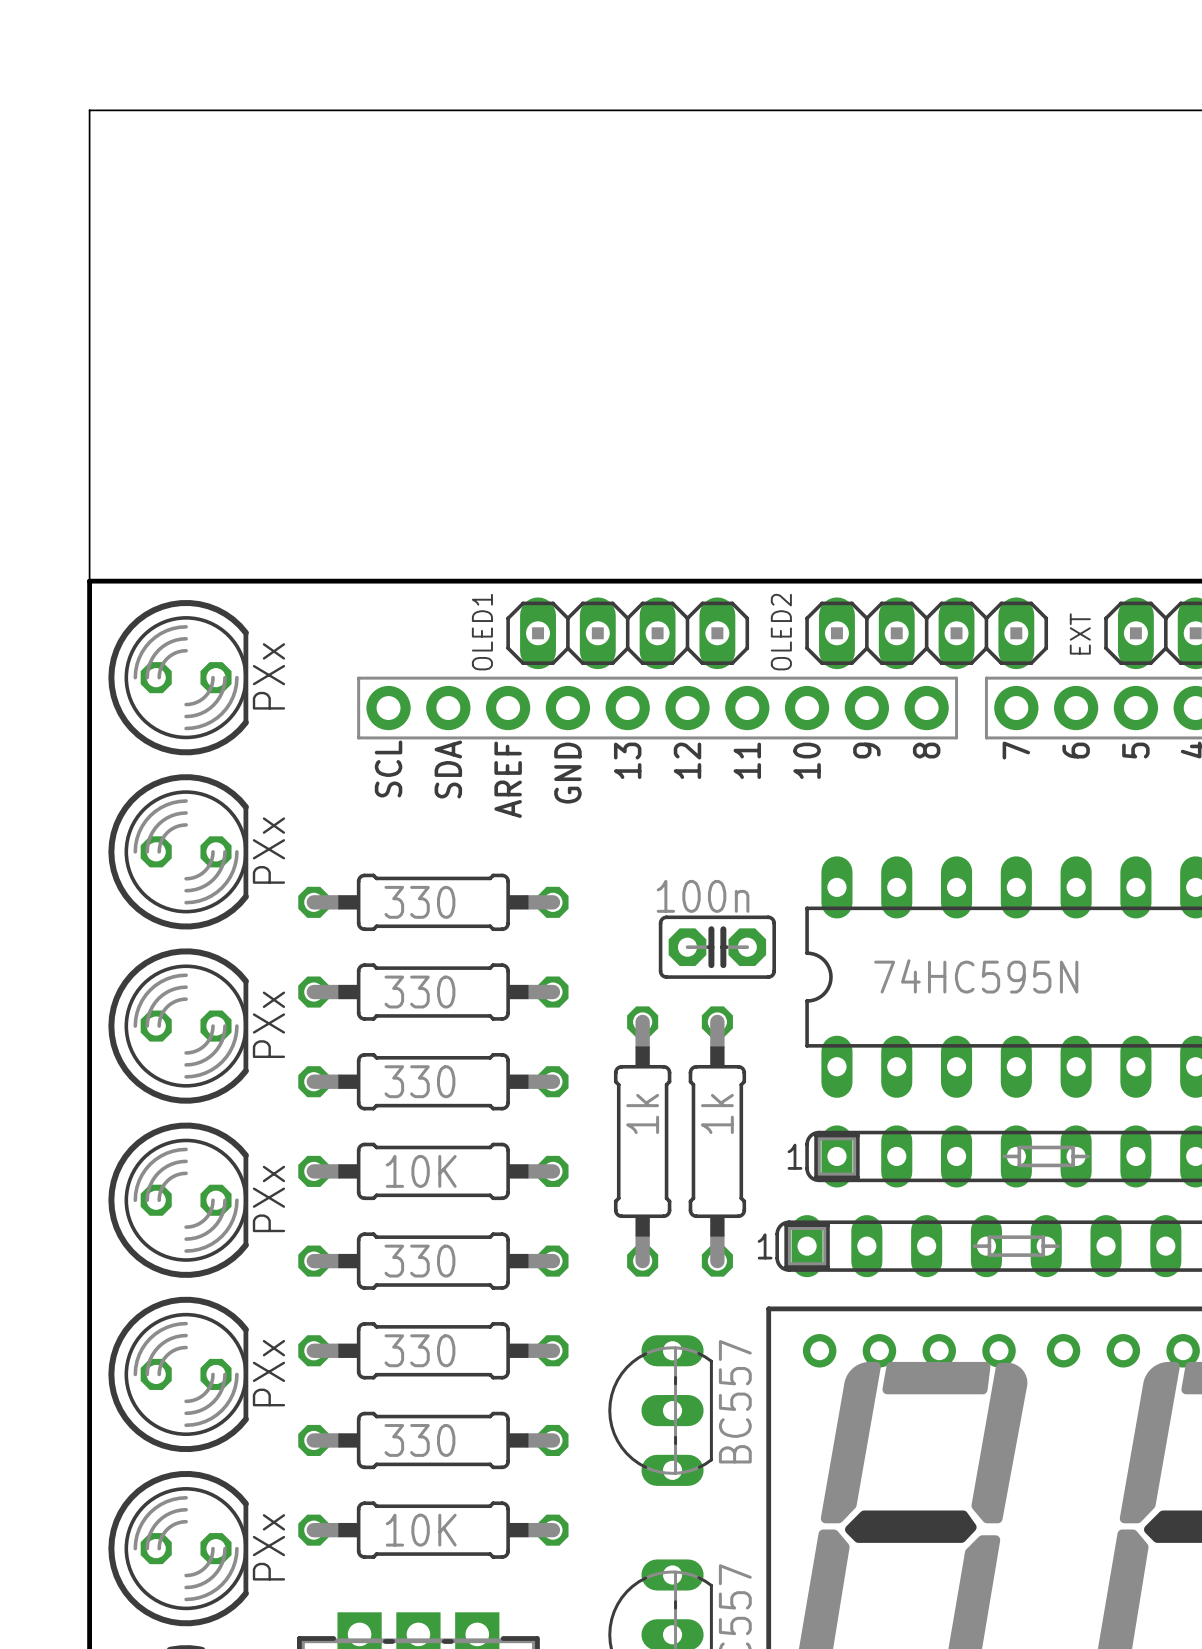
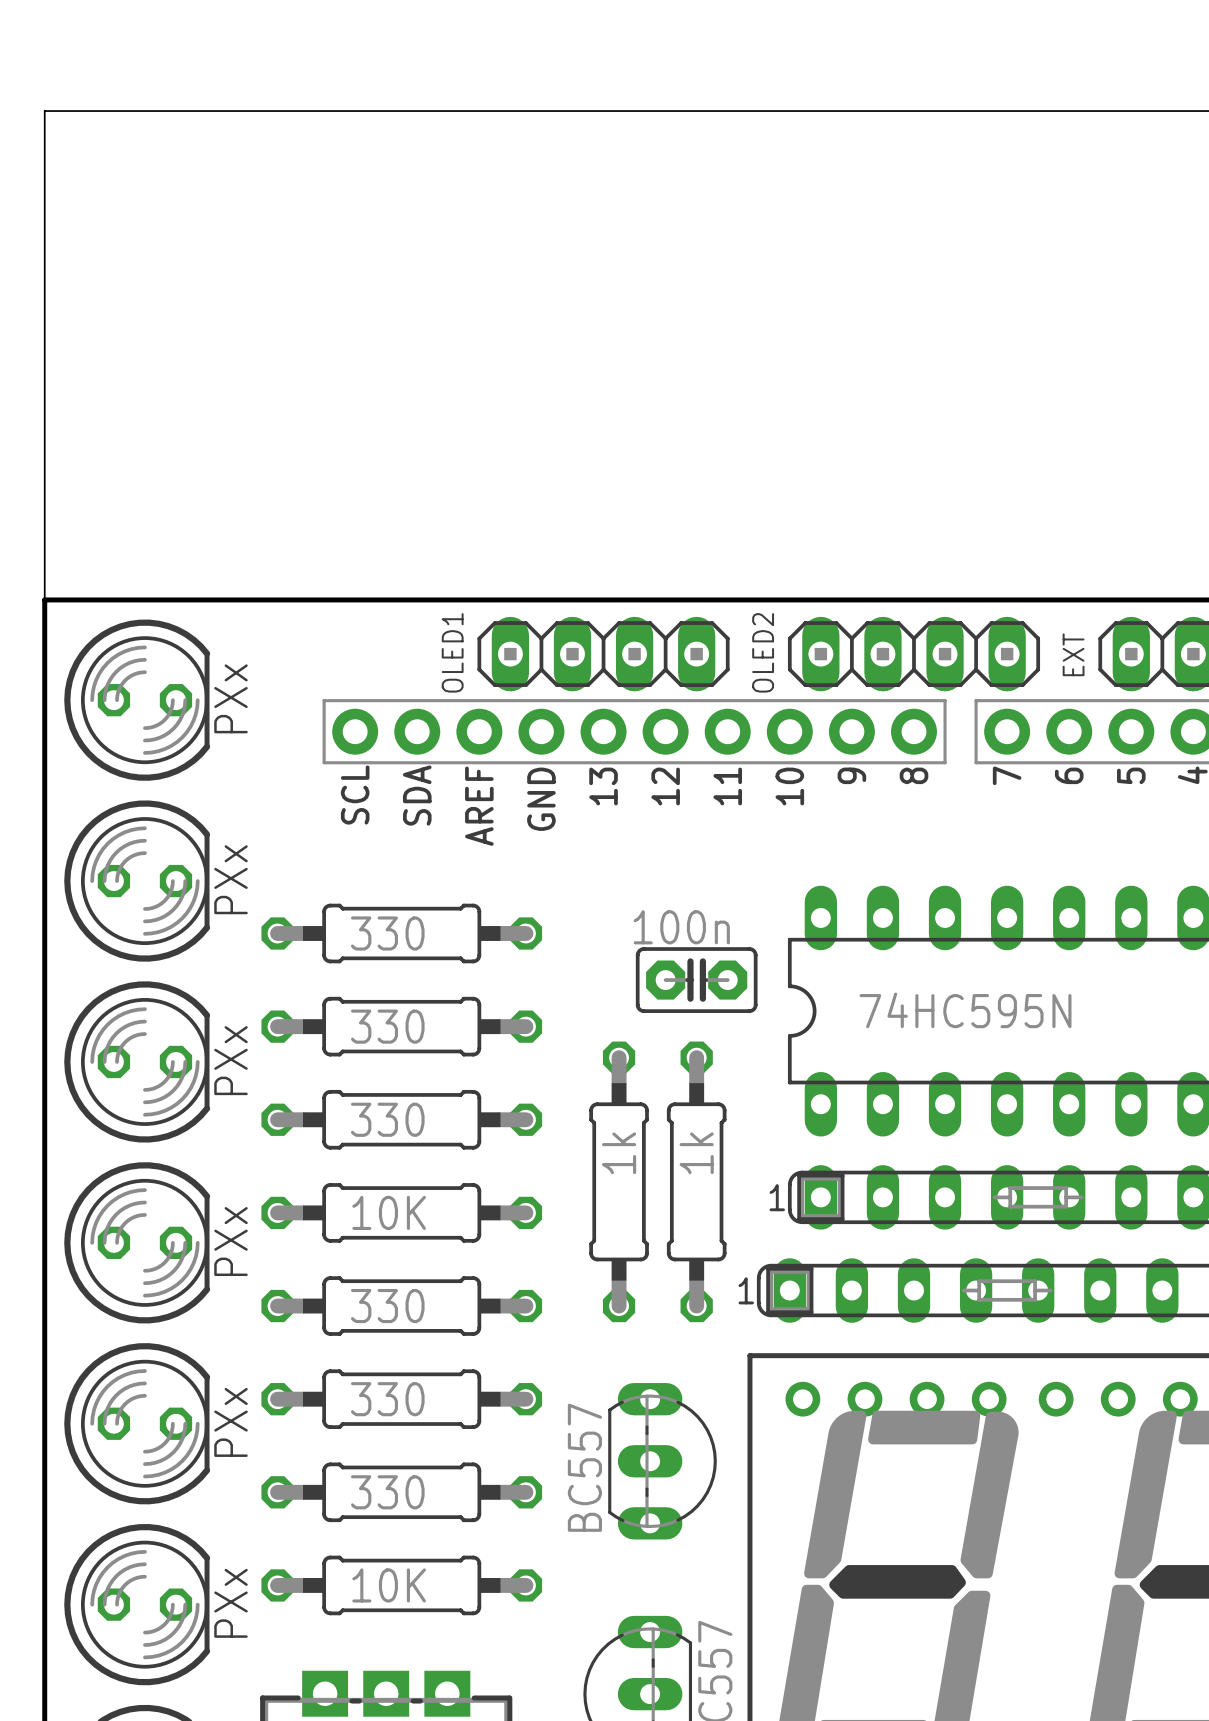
part rotation: 0° (660, 1410) -> 180° (662, 1461)

